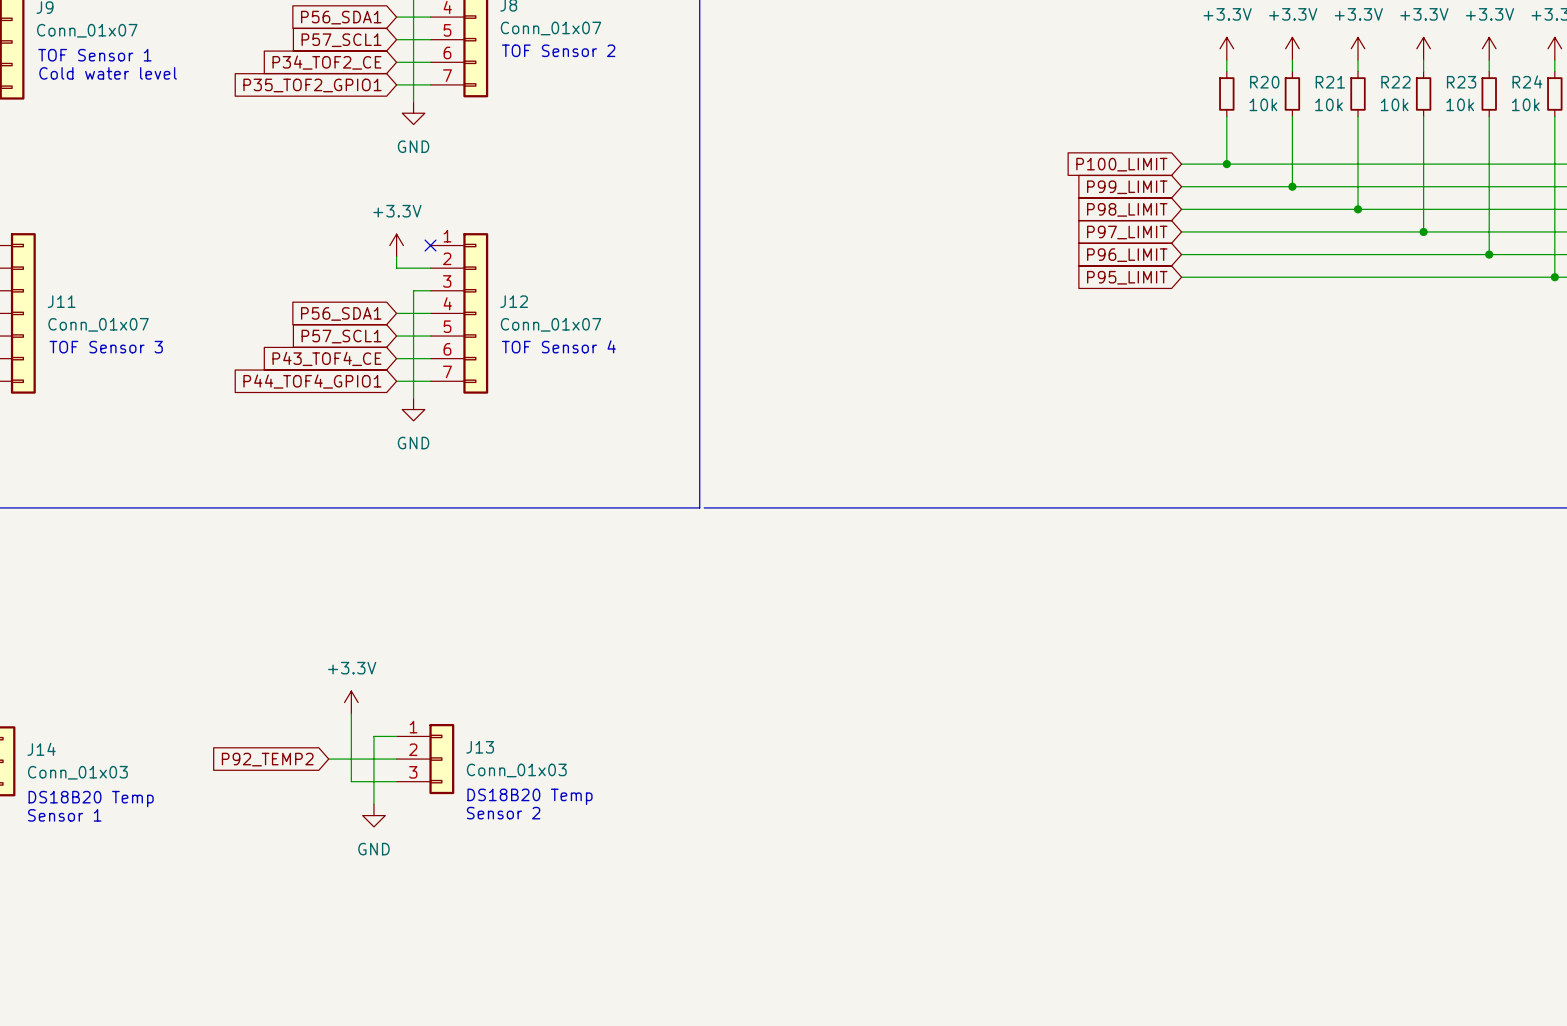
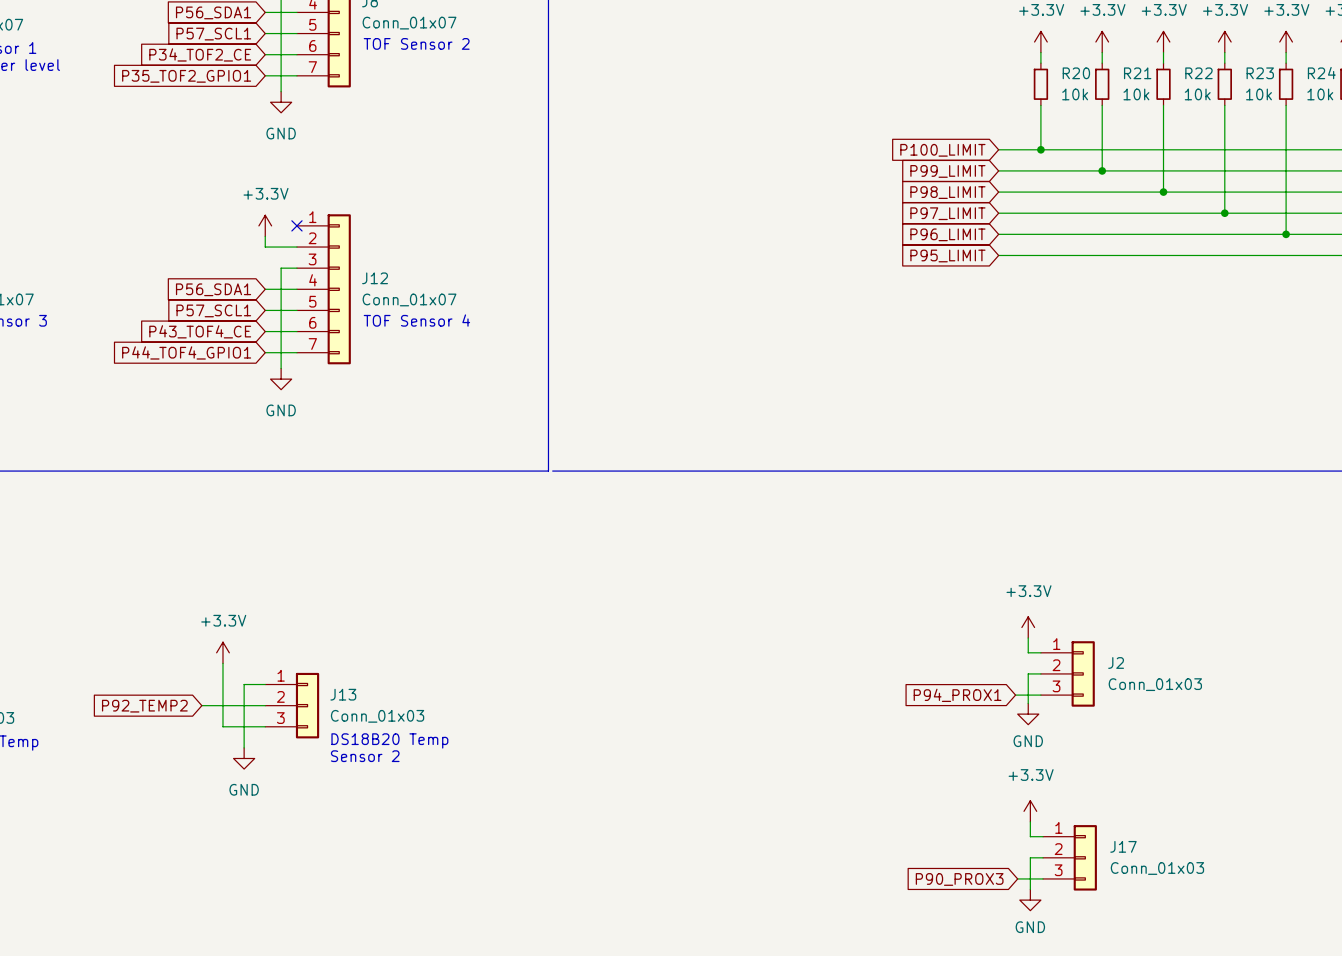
power symbol: none -> +3.3V (1028, 627)
wire: none -> (1028, 638) (1028, 652) (1040, 652)
wire: none -> (1040, 673) (1028, 673) (1028, 703)
J2: none -> Conn_01x03 (1067, 673)
wire: none -> (1015, 695) (1040, 695)
global label: none -> P94_PROX1 (957, 695)
power symbol: none -> GND (1028, 714)
power symbol: none -> +3.3V (1030, 811)
wire: none -> (1030, 821) (1030, 836) (1043, 836)
wire: none -> (1043, 857) (1030, 857) (1030, 889)
J17: none -> Conn_01x03 (1069, 857)
wire: none -> (1017, 878) (1043, 878)
global label: none -> P90_PROX3 (959, 879)
power symbol: none -> GND (1030, 900)

